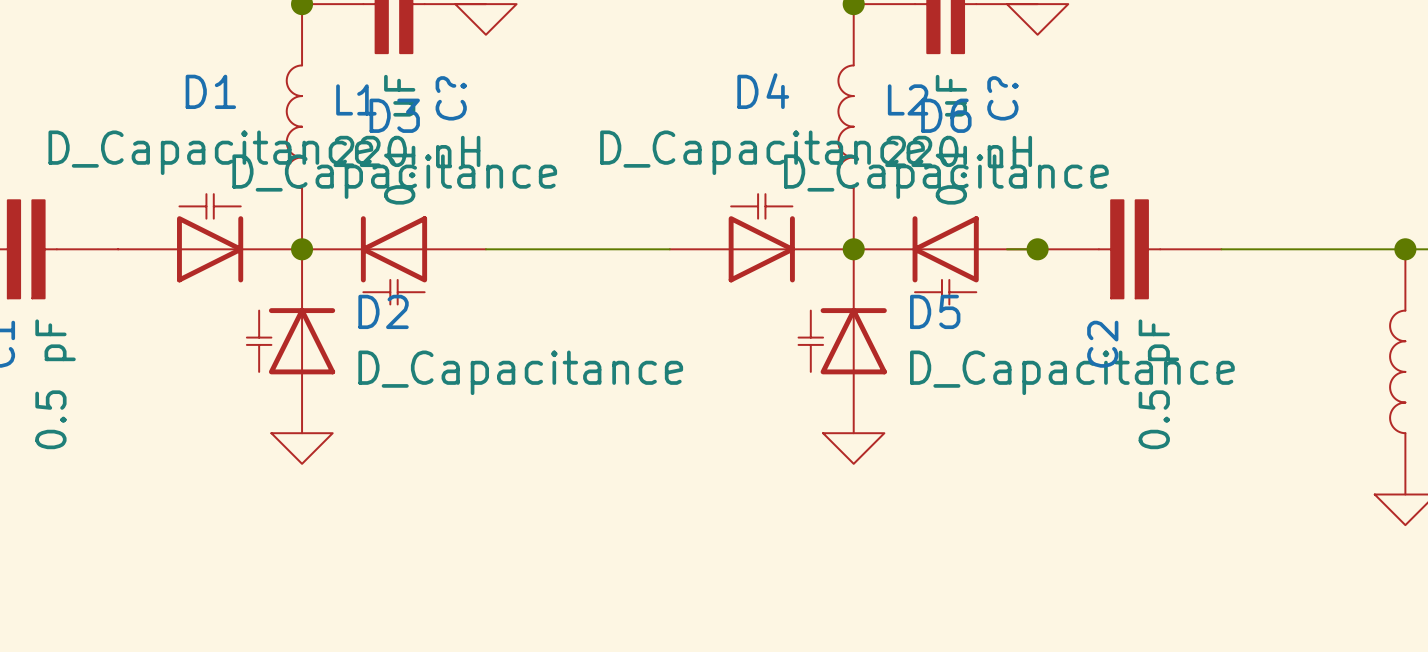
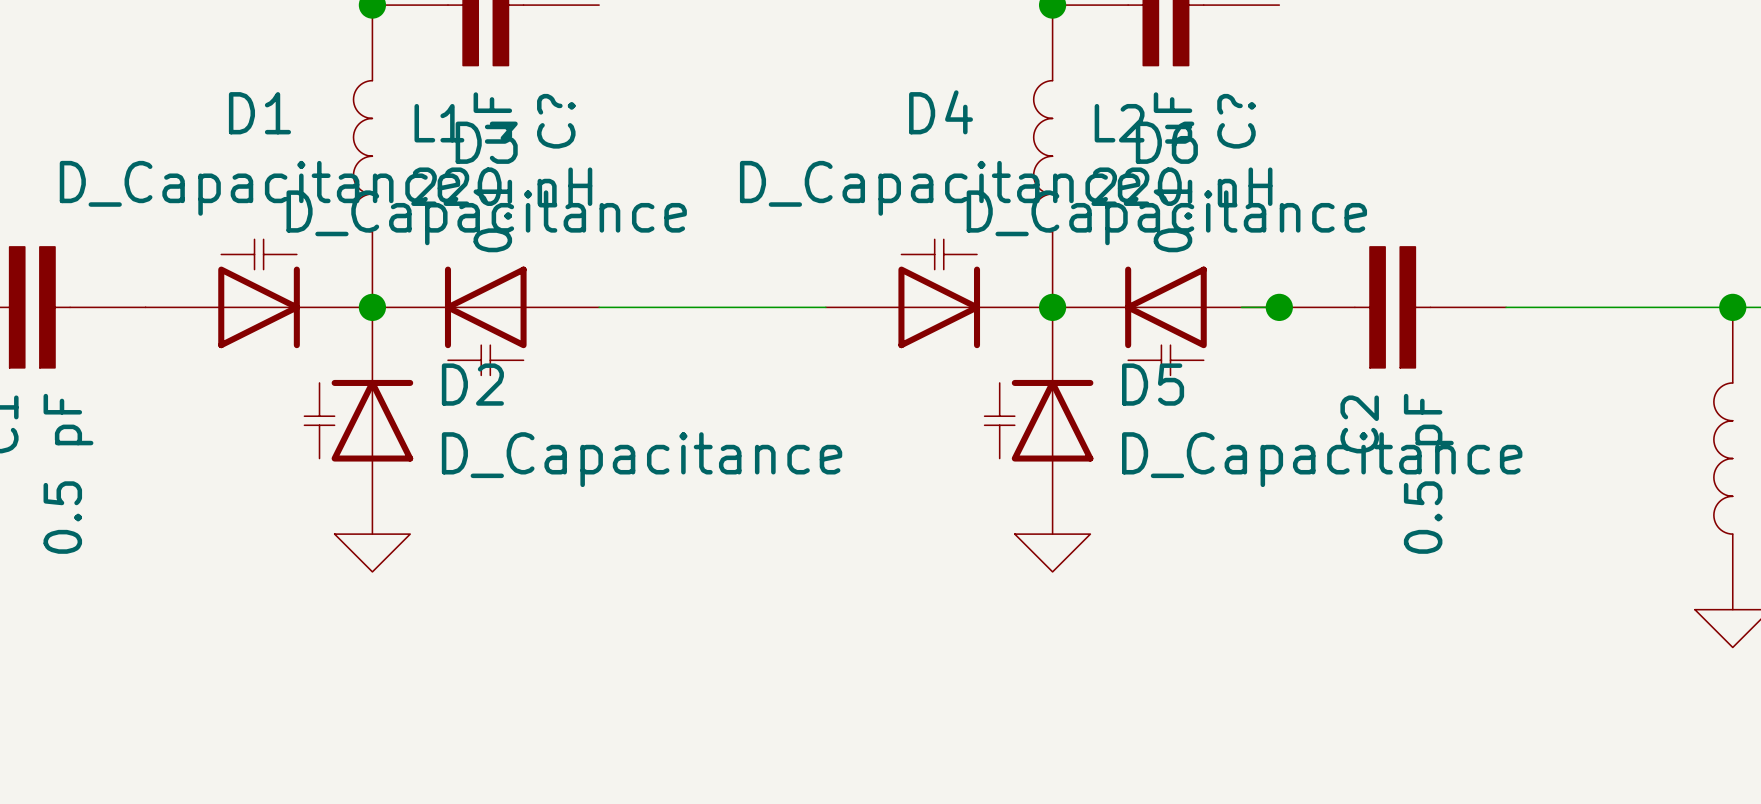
power symbol: (485, 19) -> none
power symbol: (1037, 19) -> none

